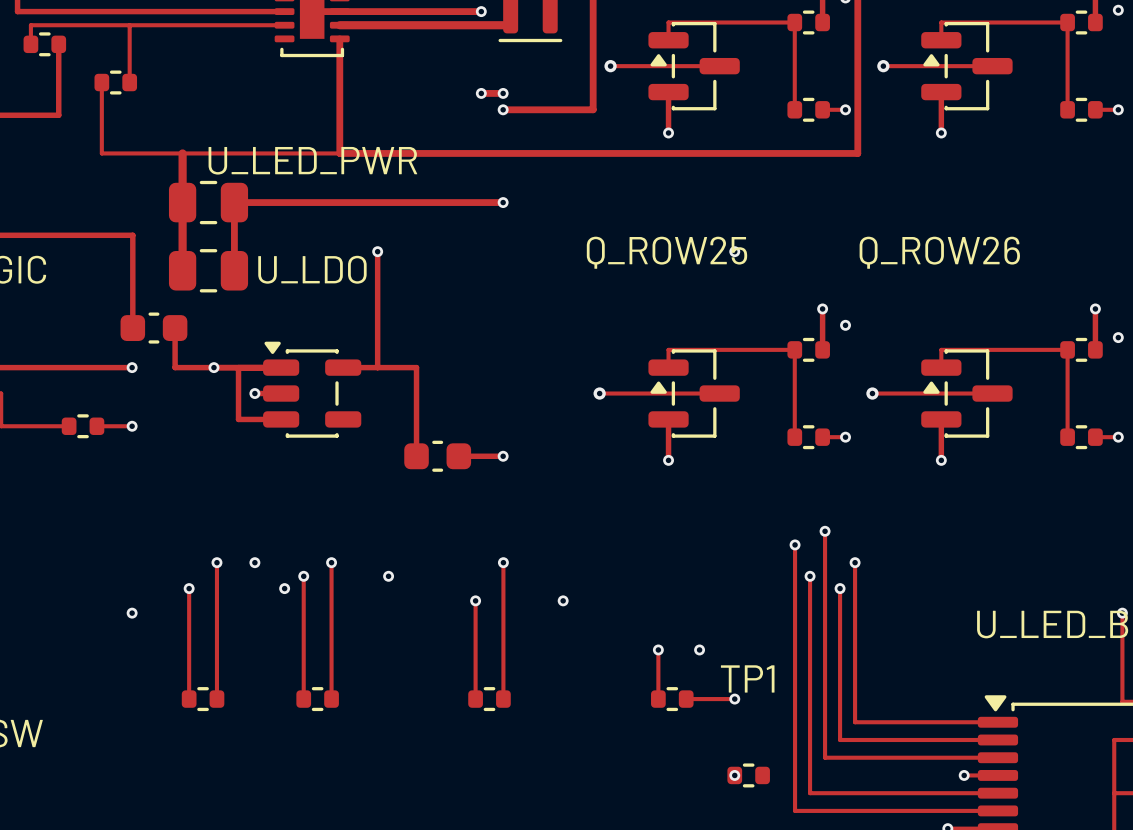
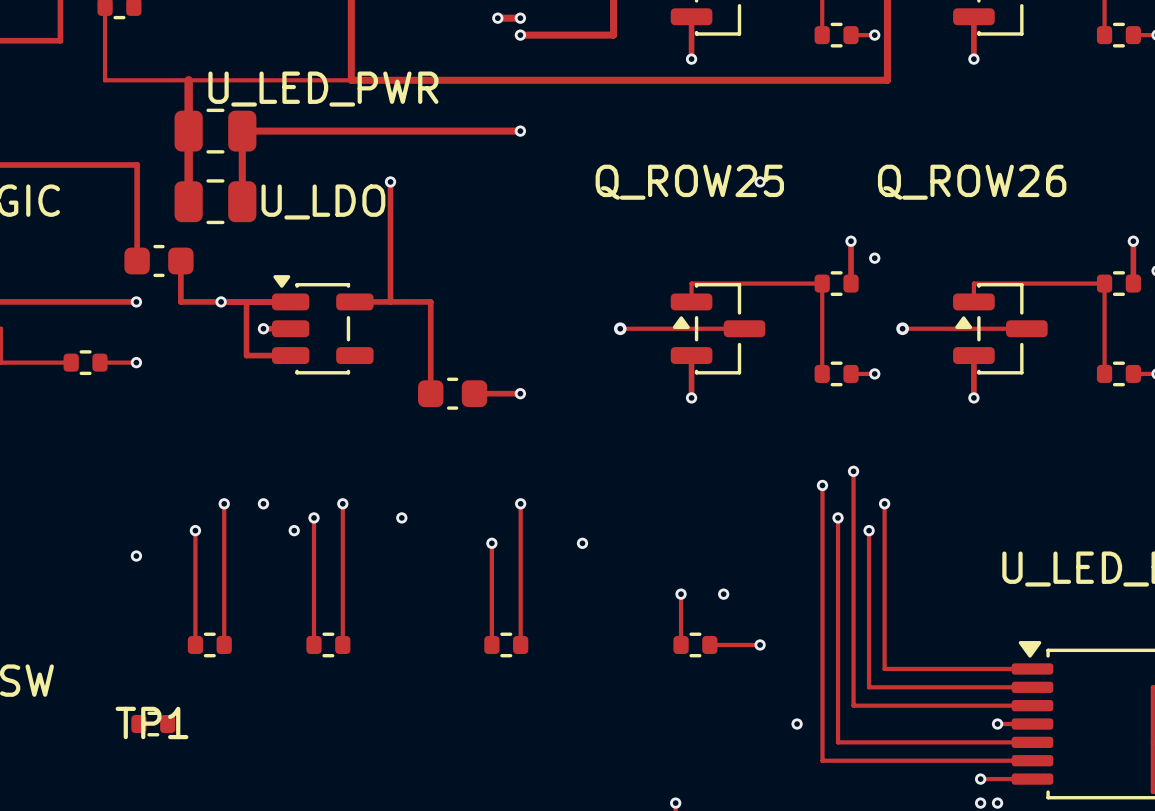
TP1 name position: TP1 (747, 678) -> TP1 (152, 722)
via position: (734, 775) -> (797, 724)
TP1 position: (748, 775) -> (153, 724)

